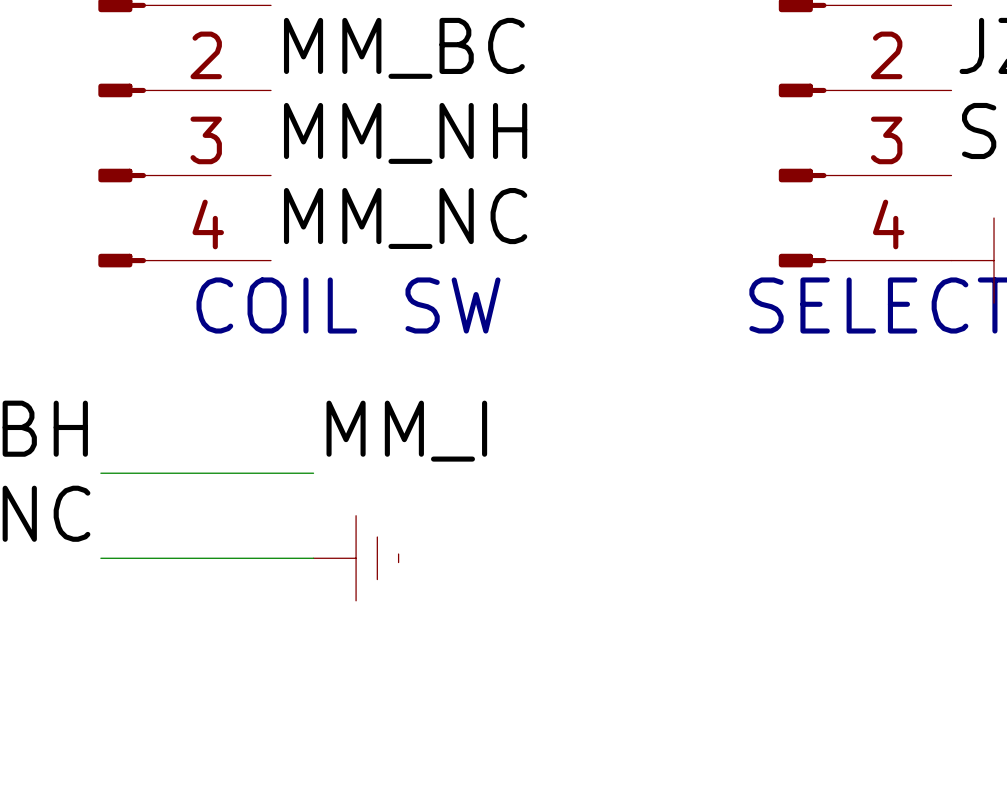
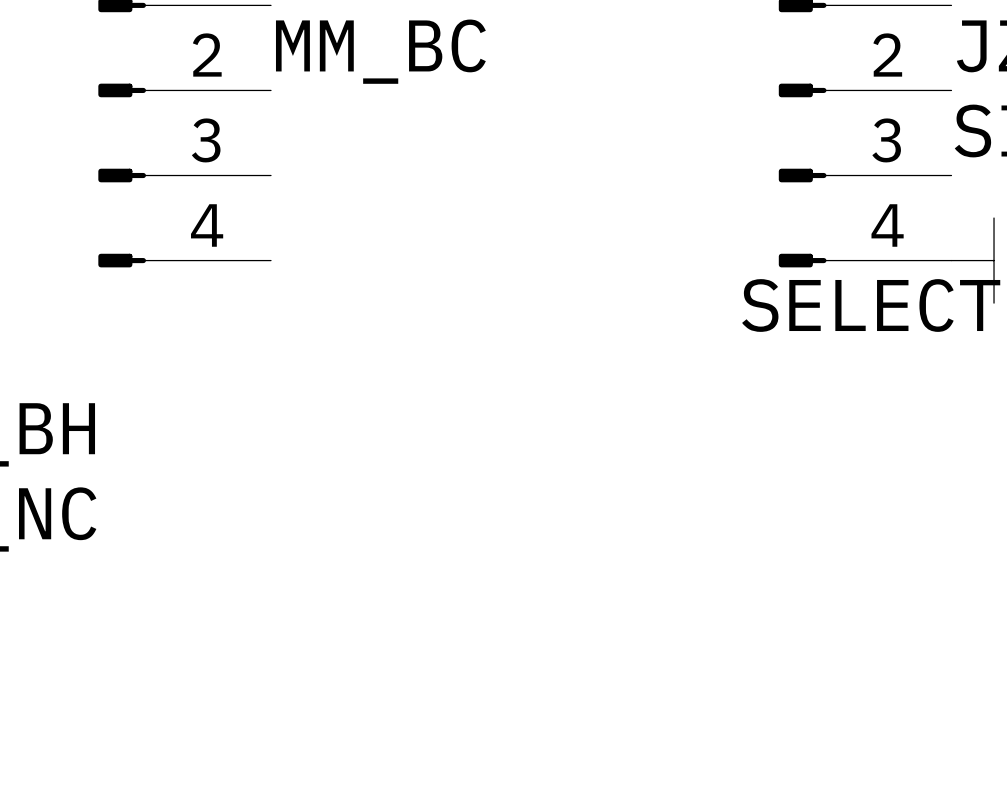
label: MM_NH (405, 133) -> none
label: MM_NC (405, 218) -> none
text: COIL SW (348, 305) -> none
label: MM_I (406, 431) -> none
wire: (100, 473) (313, 473) -> none
wire: (100, 558) (313, 558) -> none
power symbol: (356, 558) -> none

